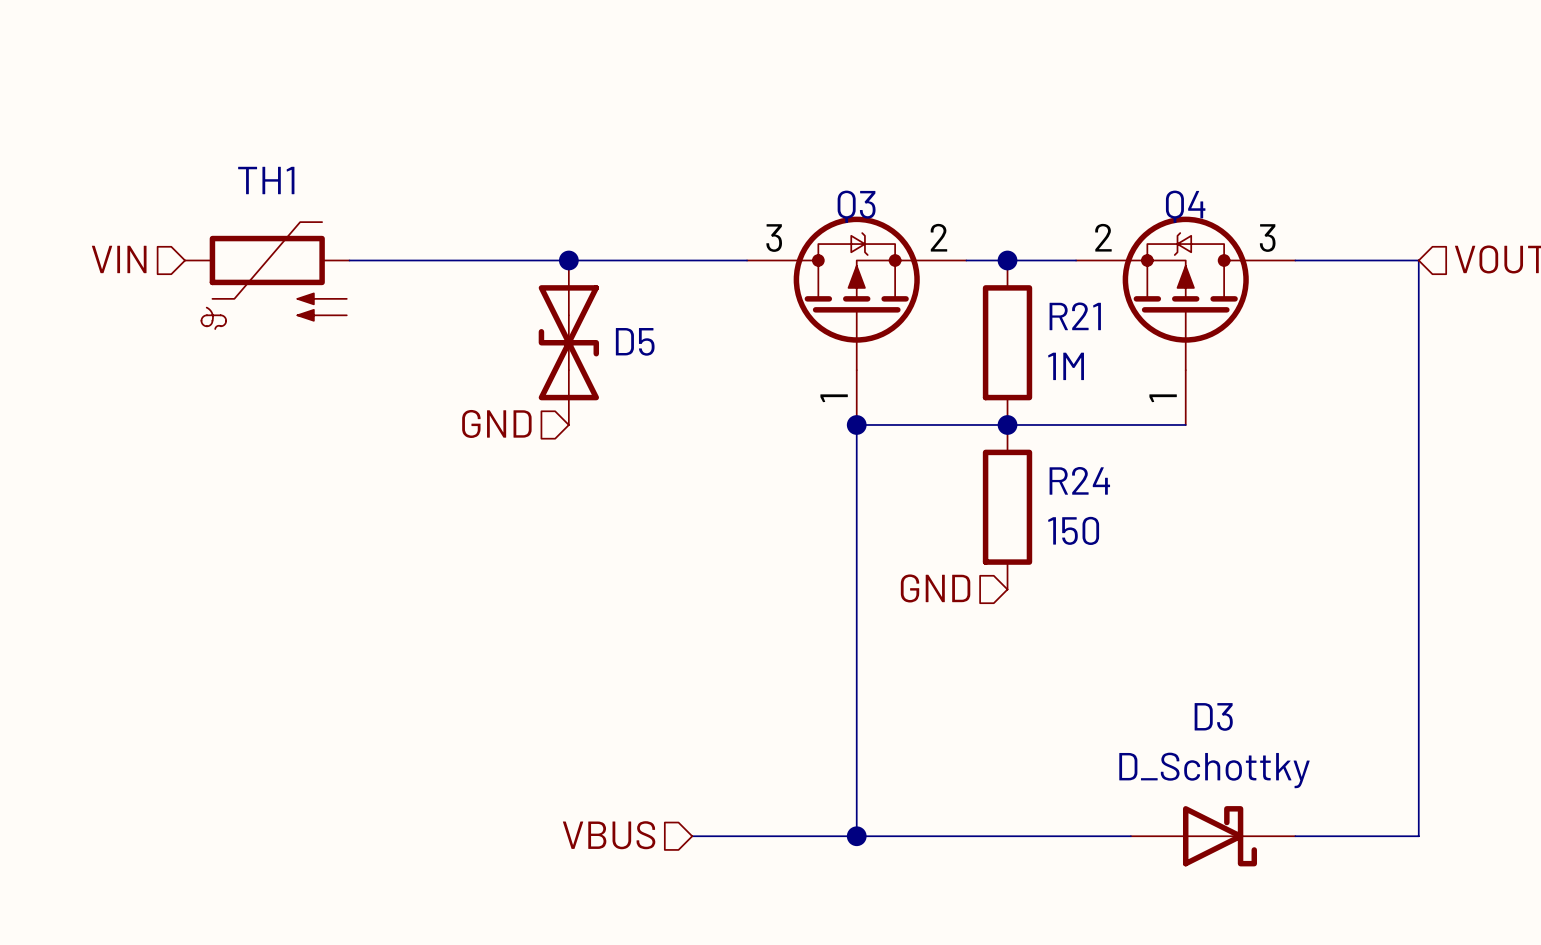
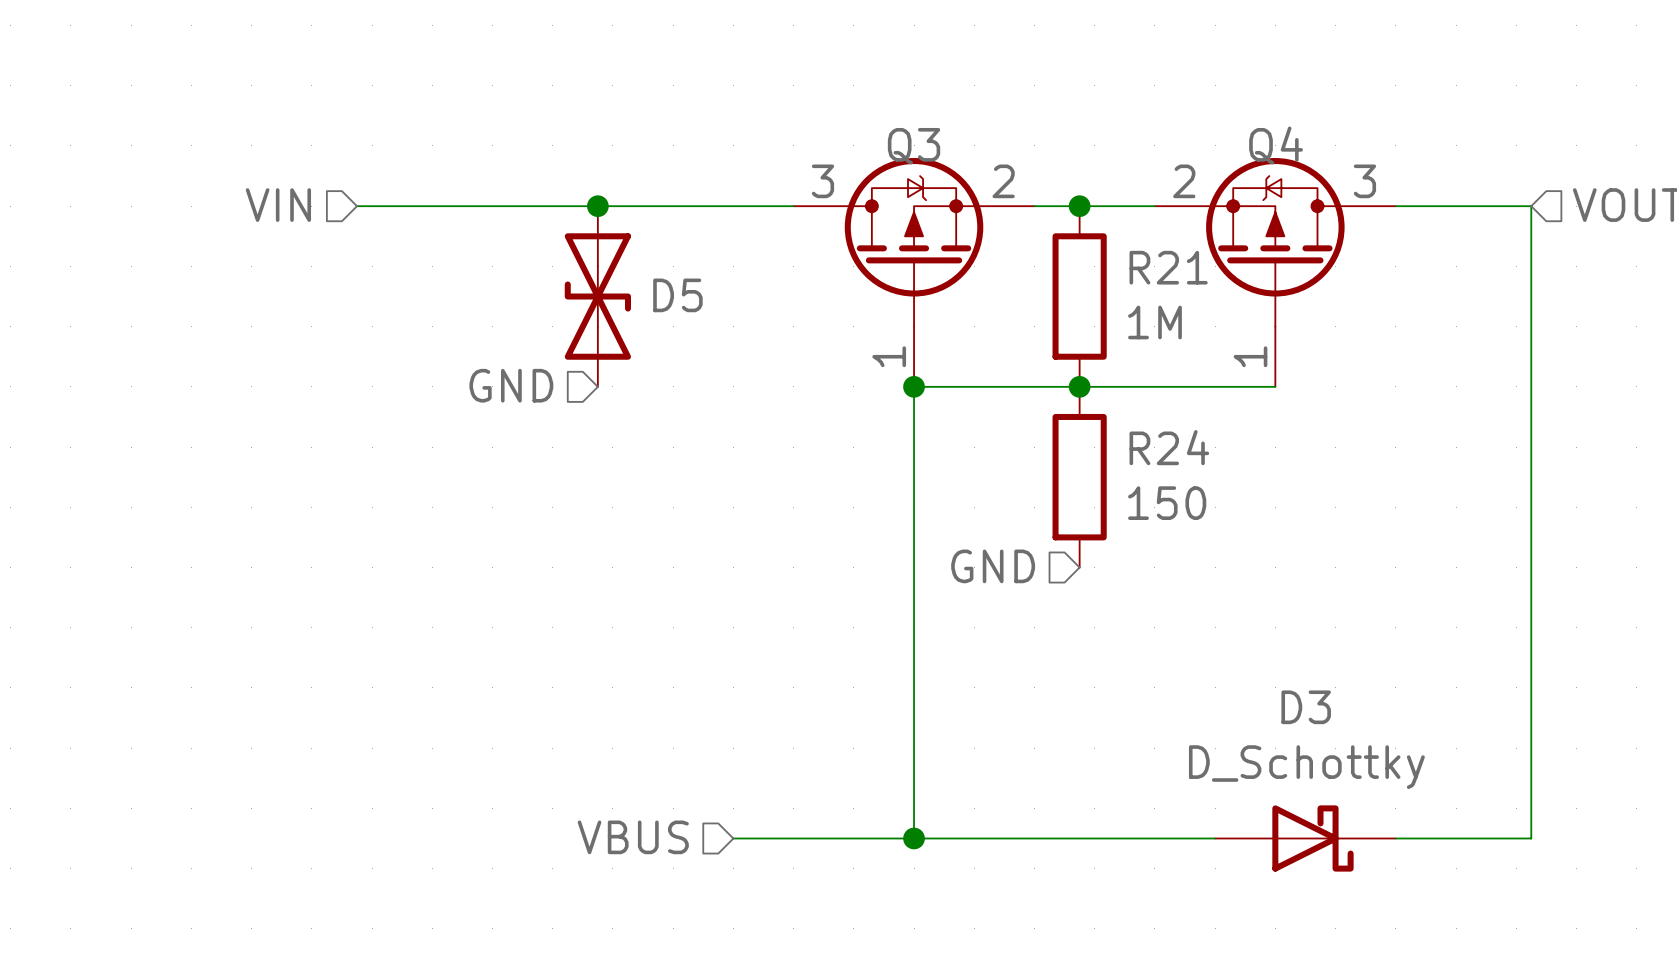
hierarchical label position: VIN (119, 259) -> VIN (278, 205)
TH1: (267, 275) -> none

